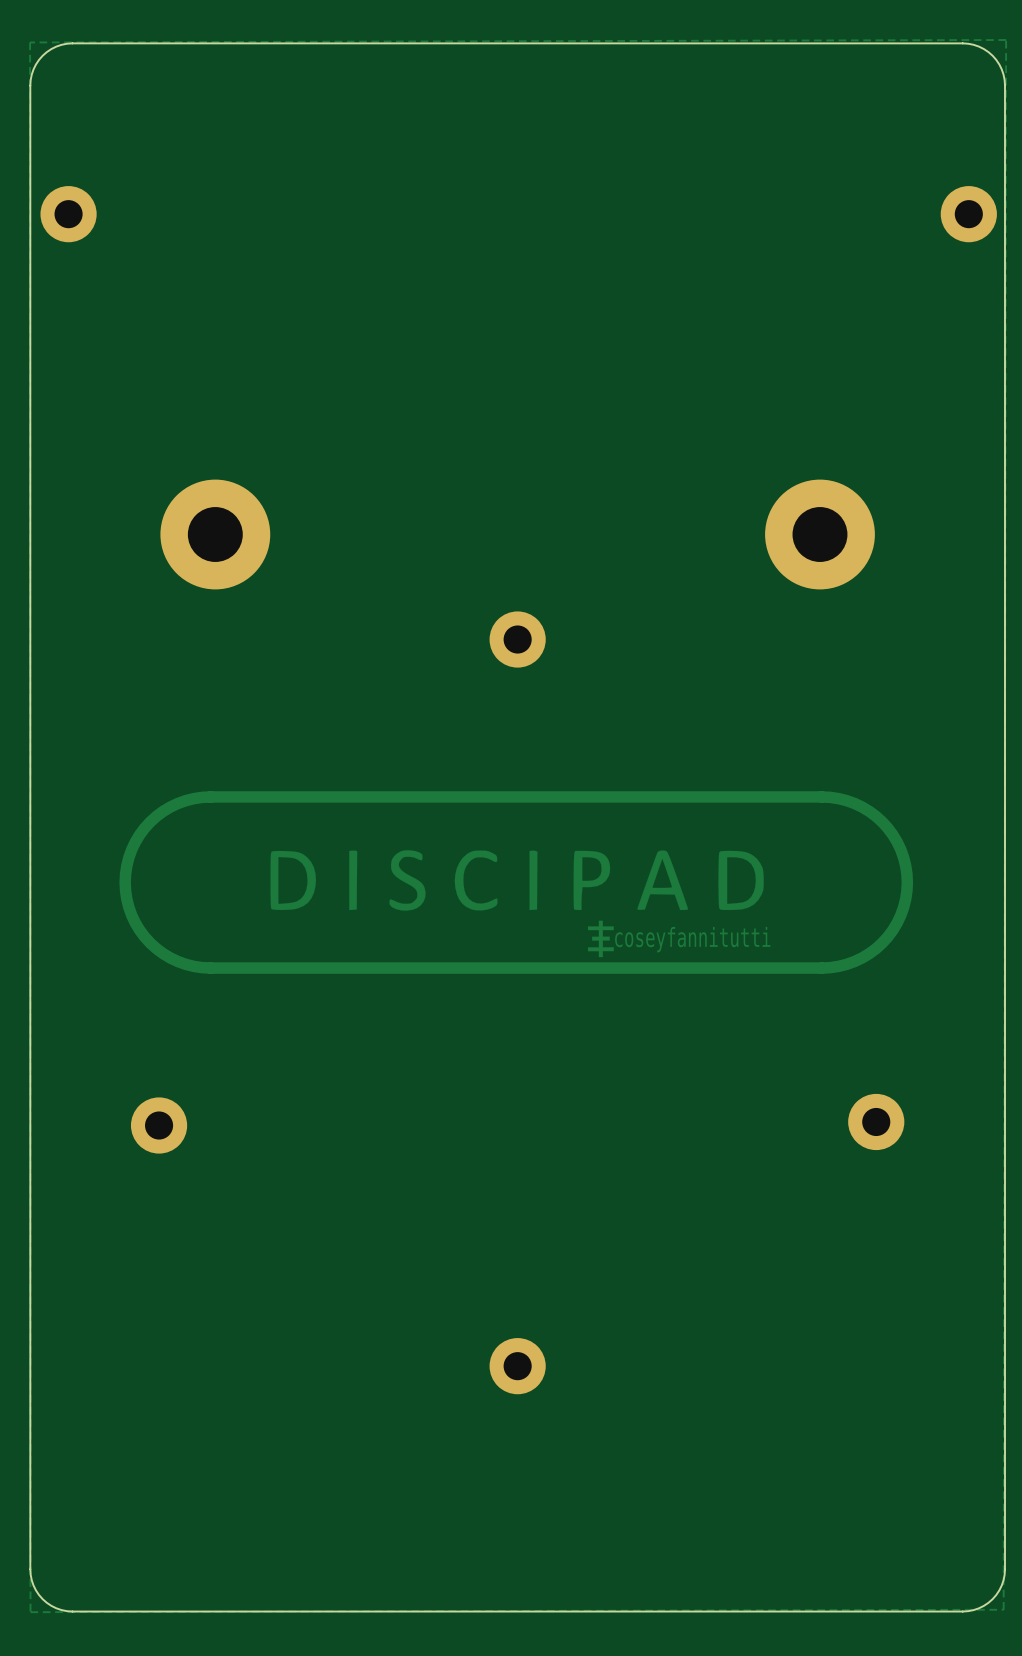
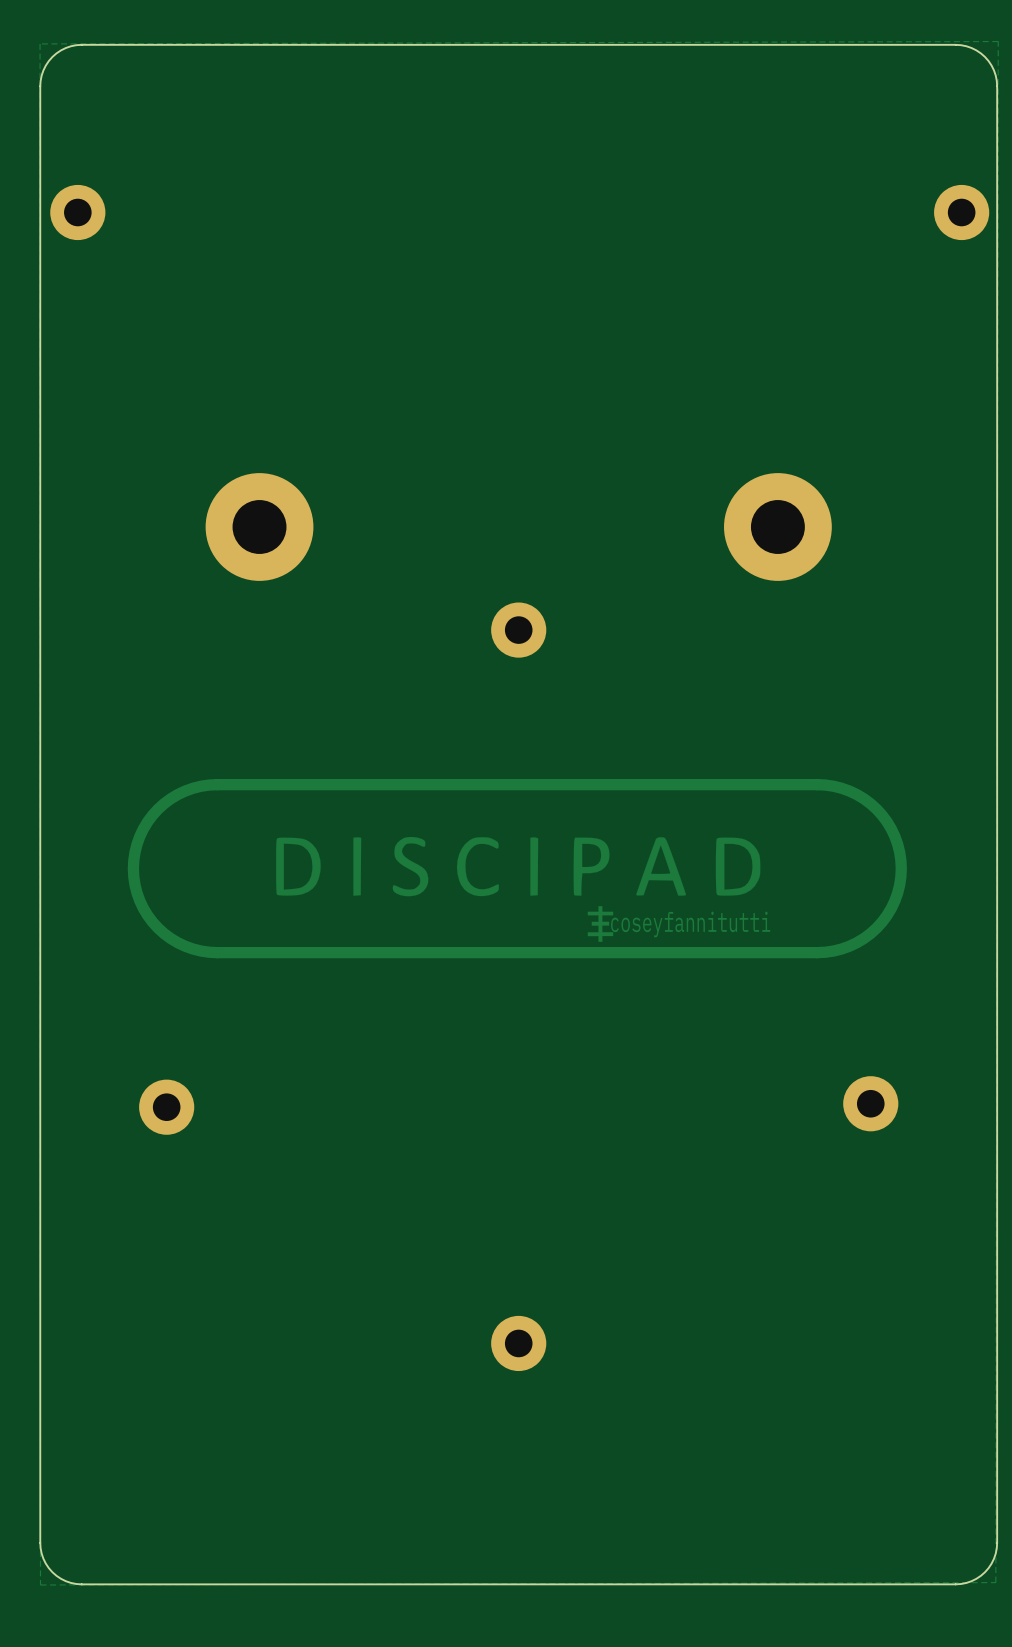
part position: (215, 534) -> (259, 527)
part position: (819, 534) -> (777, 527)

